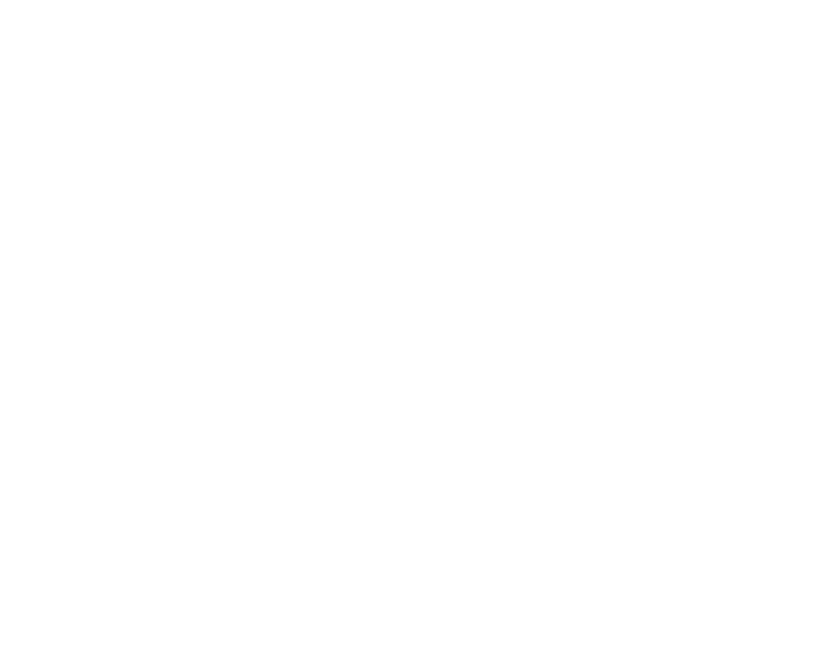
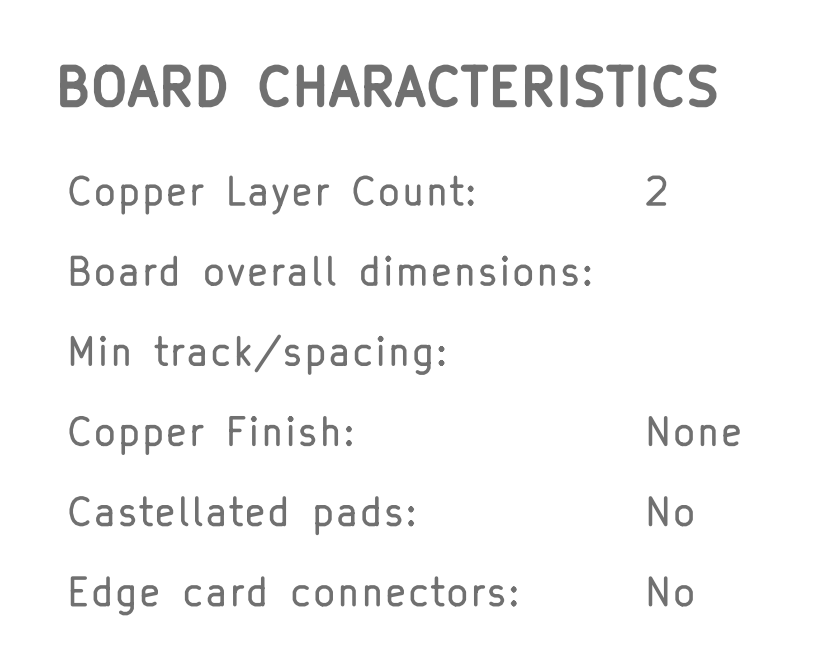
text: none -> BOARD CHARACTERISTICS (388, 85)
text: none -> 2 (656, 190)
text: none -> Copper Layer Count: (271, 195)
text: none -> Board overall dimensions: (330, 270)
text: none -> Min track/spacing: (257, 354)
text: none -> None (694, 431)
text: none -> Copper Finish: (210, 435)
text: none -> No (670, 511)
text: none -> Castellated pads: (241, 515)
text: none -> No (670, 591)
text: none -> Edge card connectors: (293, 595)

